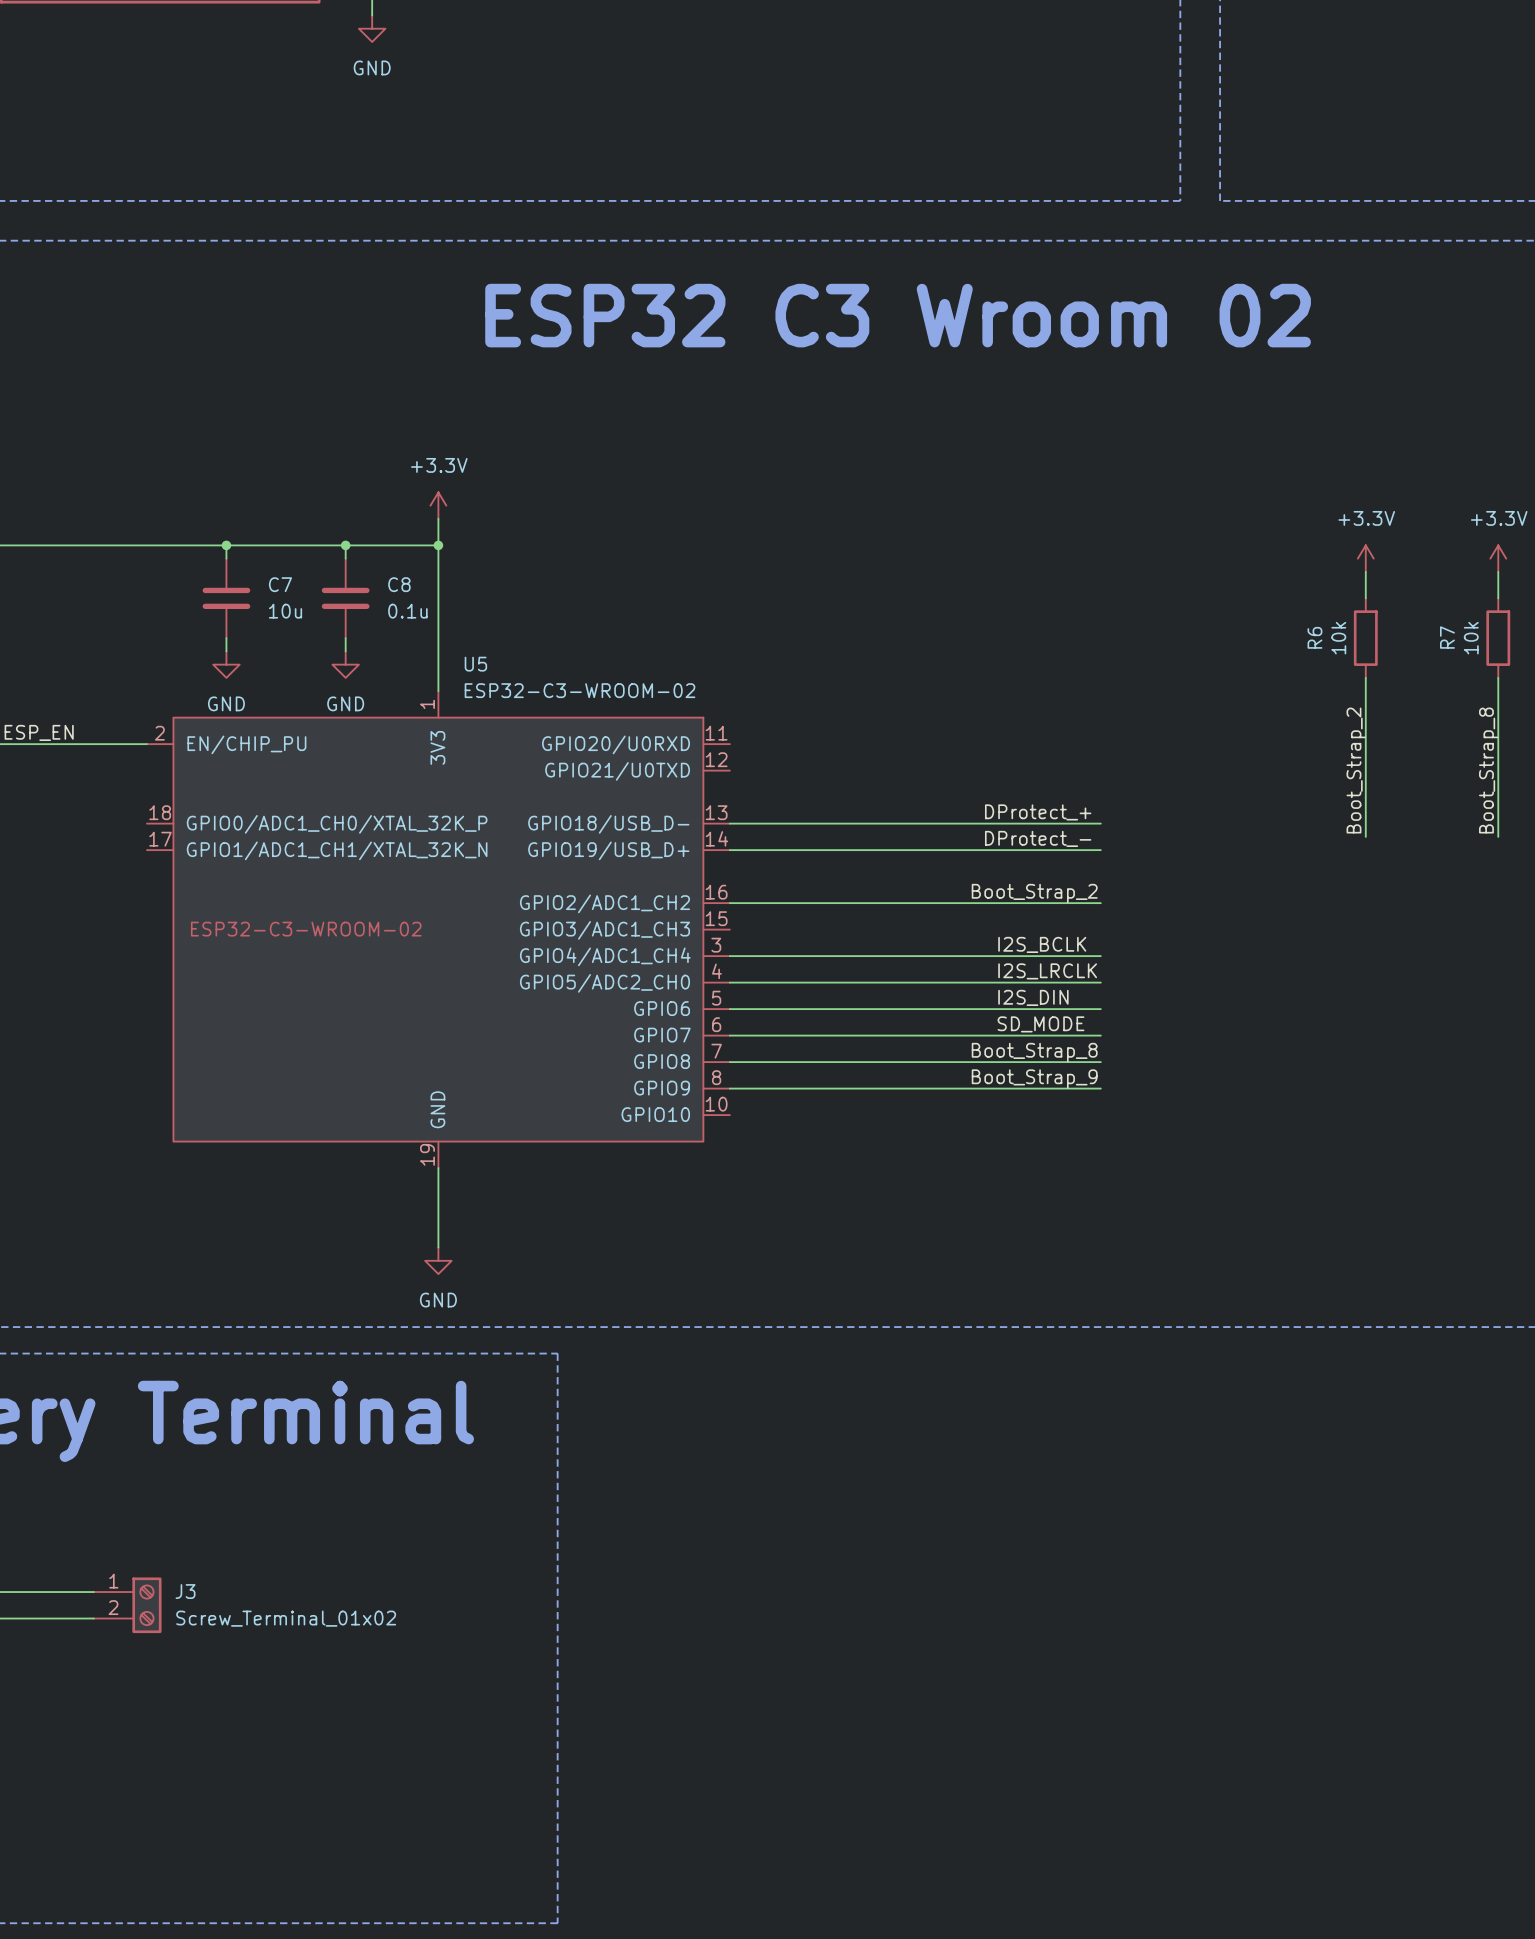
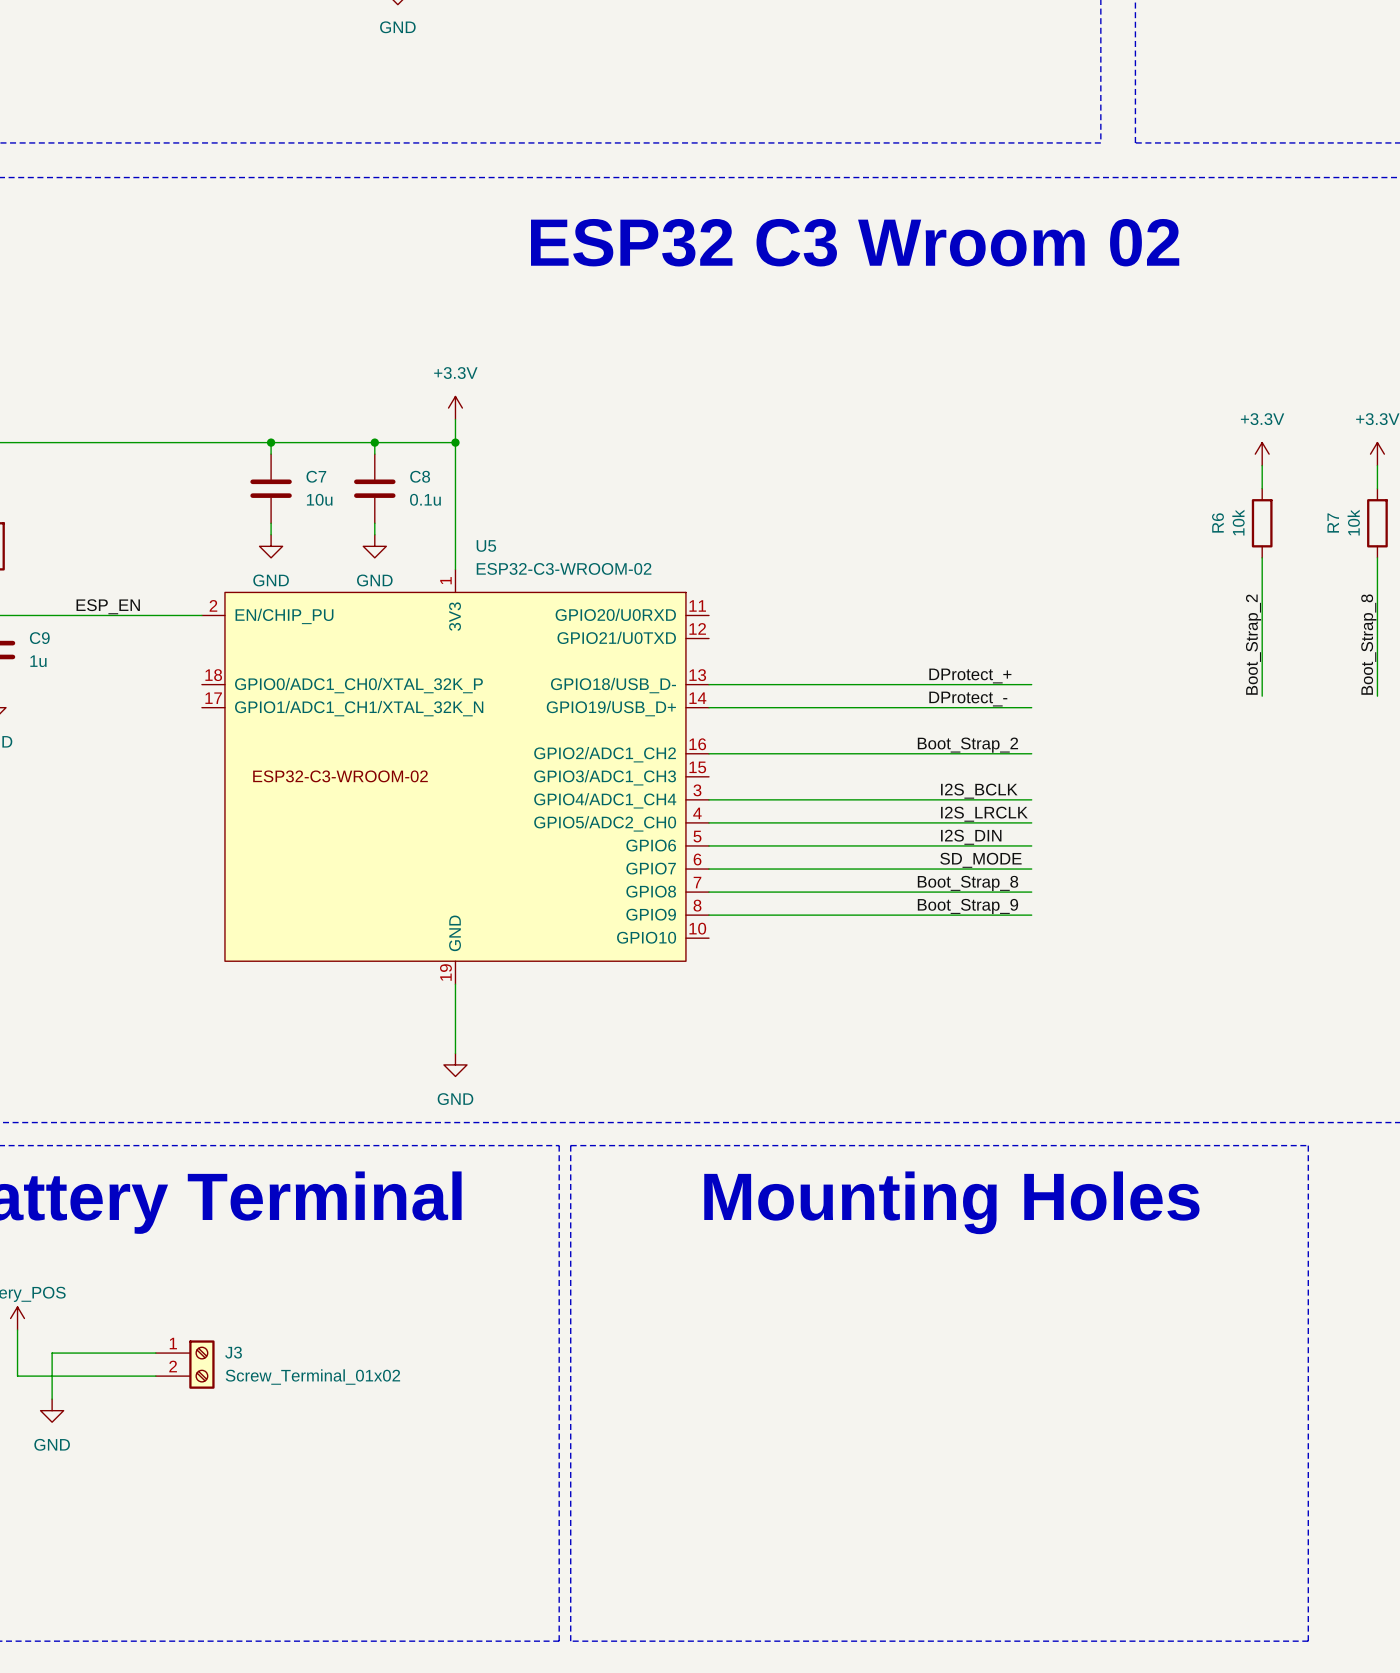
line: none -> (570, 1145) (1308, 1145) (1308, 1641) (570, 1641) (570, 1145)
text: none -> Mounting Holes (951, 1202)

